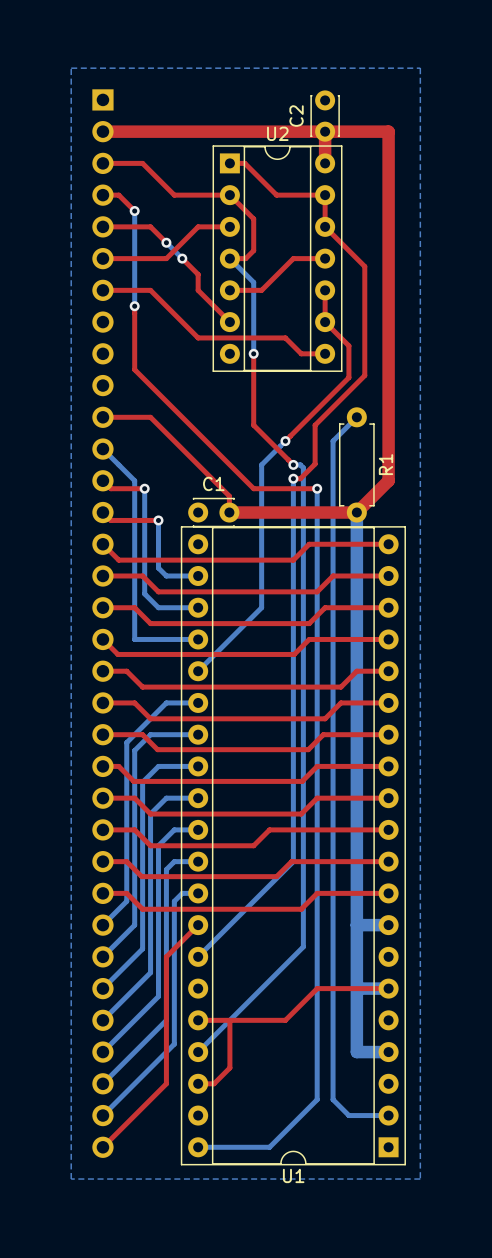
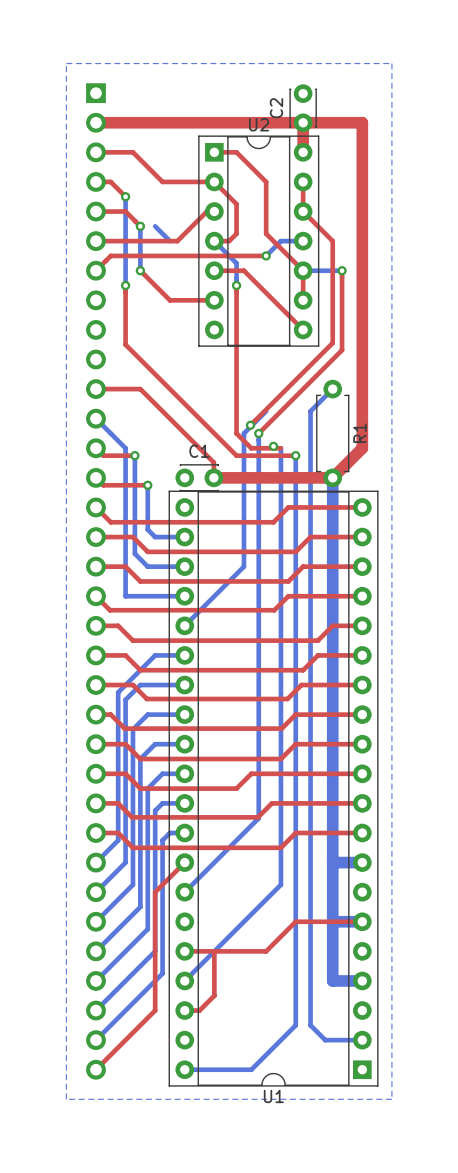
top track: (244, 163) (276, 195) (325, 195) -> (228, 152) (236, 152) (266, 181) (266, 233) (303, 270)
top track: (134, 226) (150, 226) (166, 242) -> (125, 211) (140, 226)
top track: (221, 226) (198, 226) (166, 258) -> (206, 211) (177, 241) (155, 241)
via position: (166, 242) -> (140, 226)
top track: (182, 258) (198, 274) (198, 290) (229, 322) -> (169, 300) (214, 300)
via: (182, 258) -> none
bottom track: none -> (303, 241) (280, 241) (266, 255)
top track: (325, 258) (293, 258) (261, 290) -> none
top track: (356, 258) (364, 266) (364, 375) (315, 425) (315, 464) (300, 478) (293, 478) -> (332, 241) (332, 343) (250, 425)
via: none -> (266, 255)
top track: (102, 290) (150, 290) -> (95, 270) (110, 255) (266, 255)
via: none -> (140, 270)
bottom track: none -> (303, 270) (342, 270)
top track: none -> (342, 270) (342, 350) (258, 433)
via: none -> (342, 270)
bottom track: (253, 306) (253, 353) -> (140, 226) (140, 270)
top track: none -> (236, 285) (236, 329)
via: none -> (236, 285)
top track: (182, 322) (198, 337) (285, 337) (301, 353) (325, 353) -> (243, 270) (303, 329)
top track: (325, 322) (348, 345) (348, 377) (285, 441) -> none
via: (253, 353) -> none
top track: (253, 425) (293, 464) -> (236, 396) (236, 433) (251, 448) (280, 448)
via: (285, 441) -> none
via: none -> (250, 425)
via: none -> (258, 433)
bottom track: (293, 464) (300, 464) (303, 467) (303, 946) (301, 948) -> (280, 448) (280, 884)
via: (293, 464) -> none
bottom track: (293, 478) (293, 861) (277, 877) -> (258, 433) (258, 818)

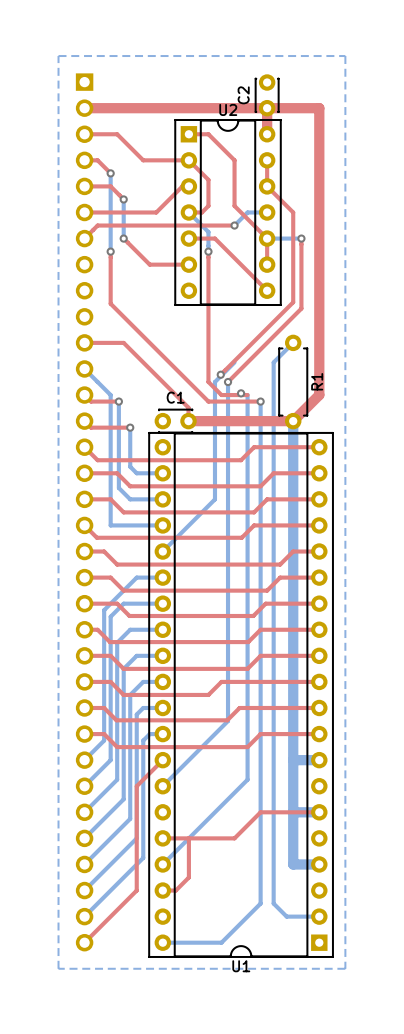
bottom track: (155, 226) (169, 241) -> none

